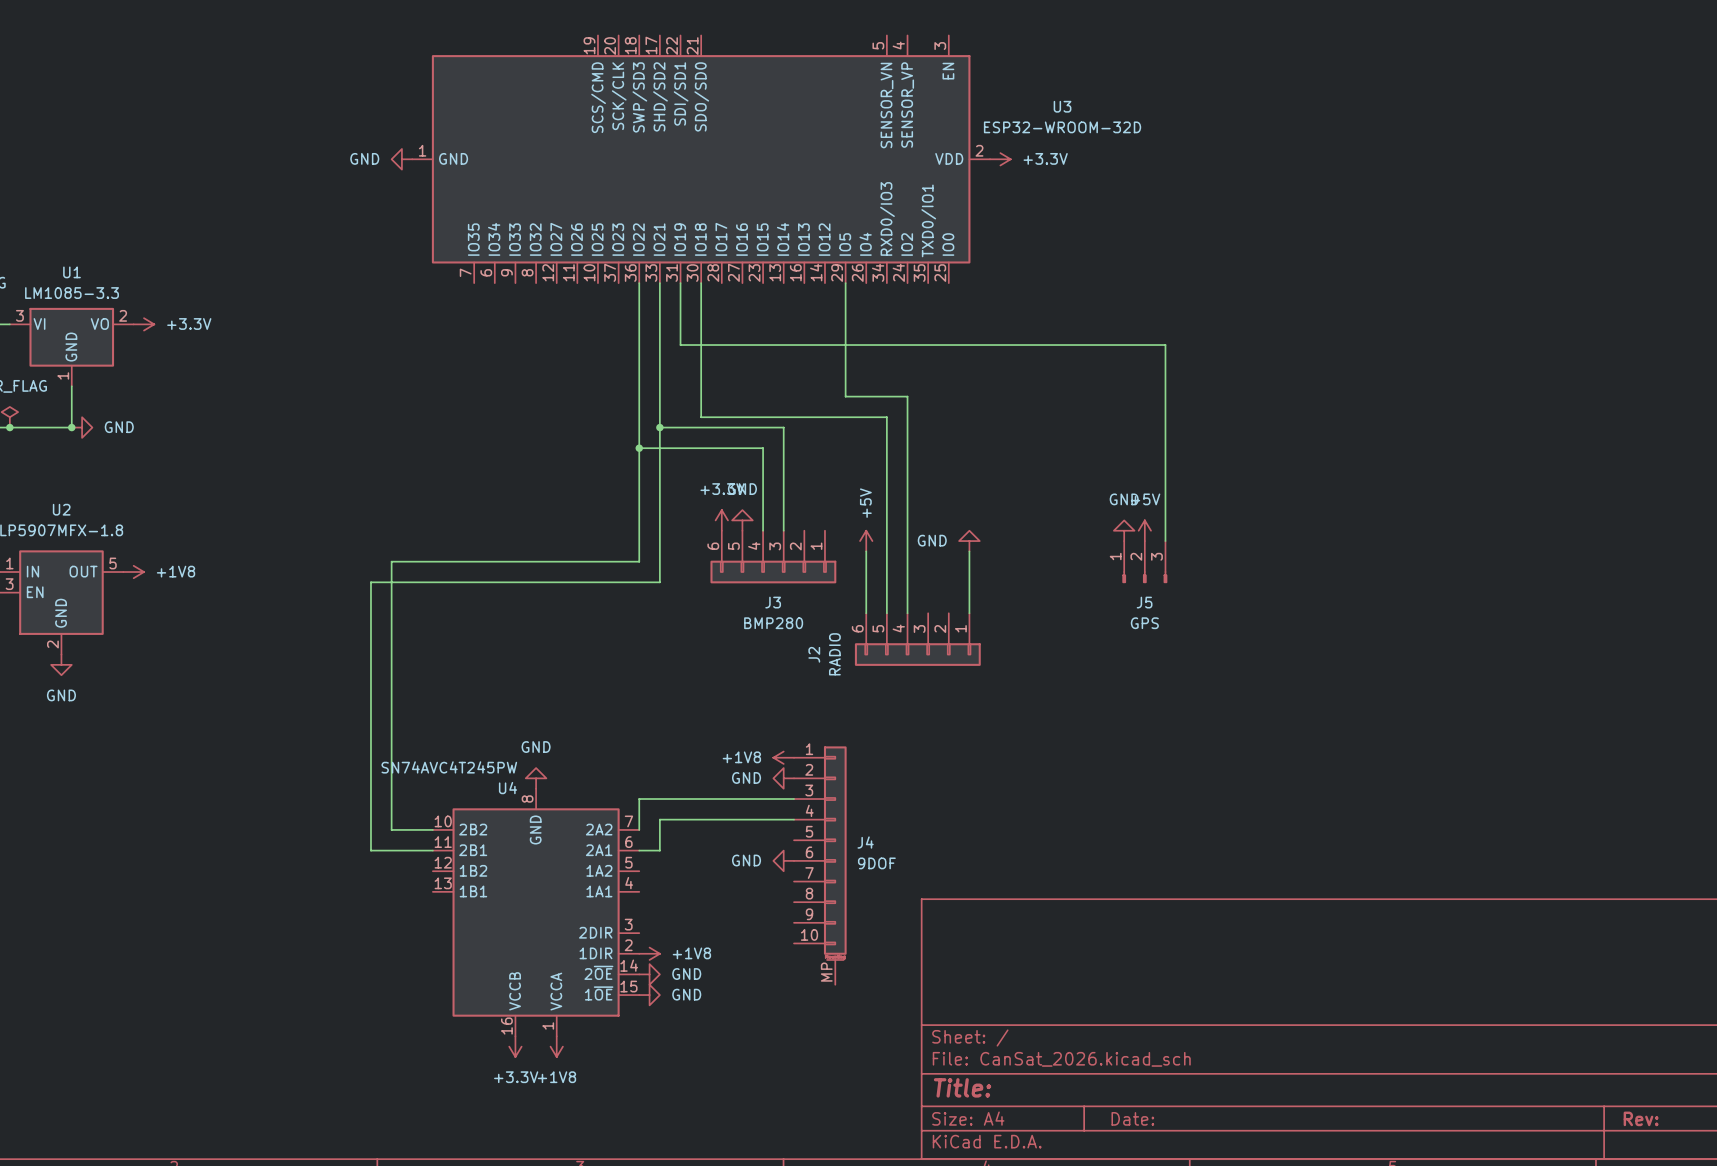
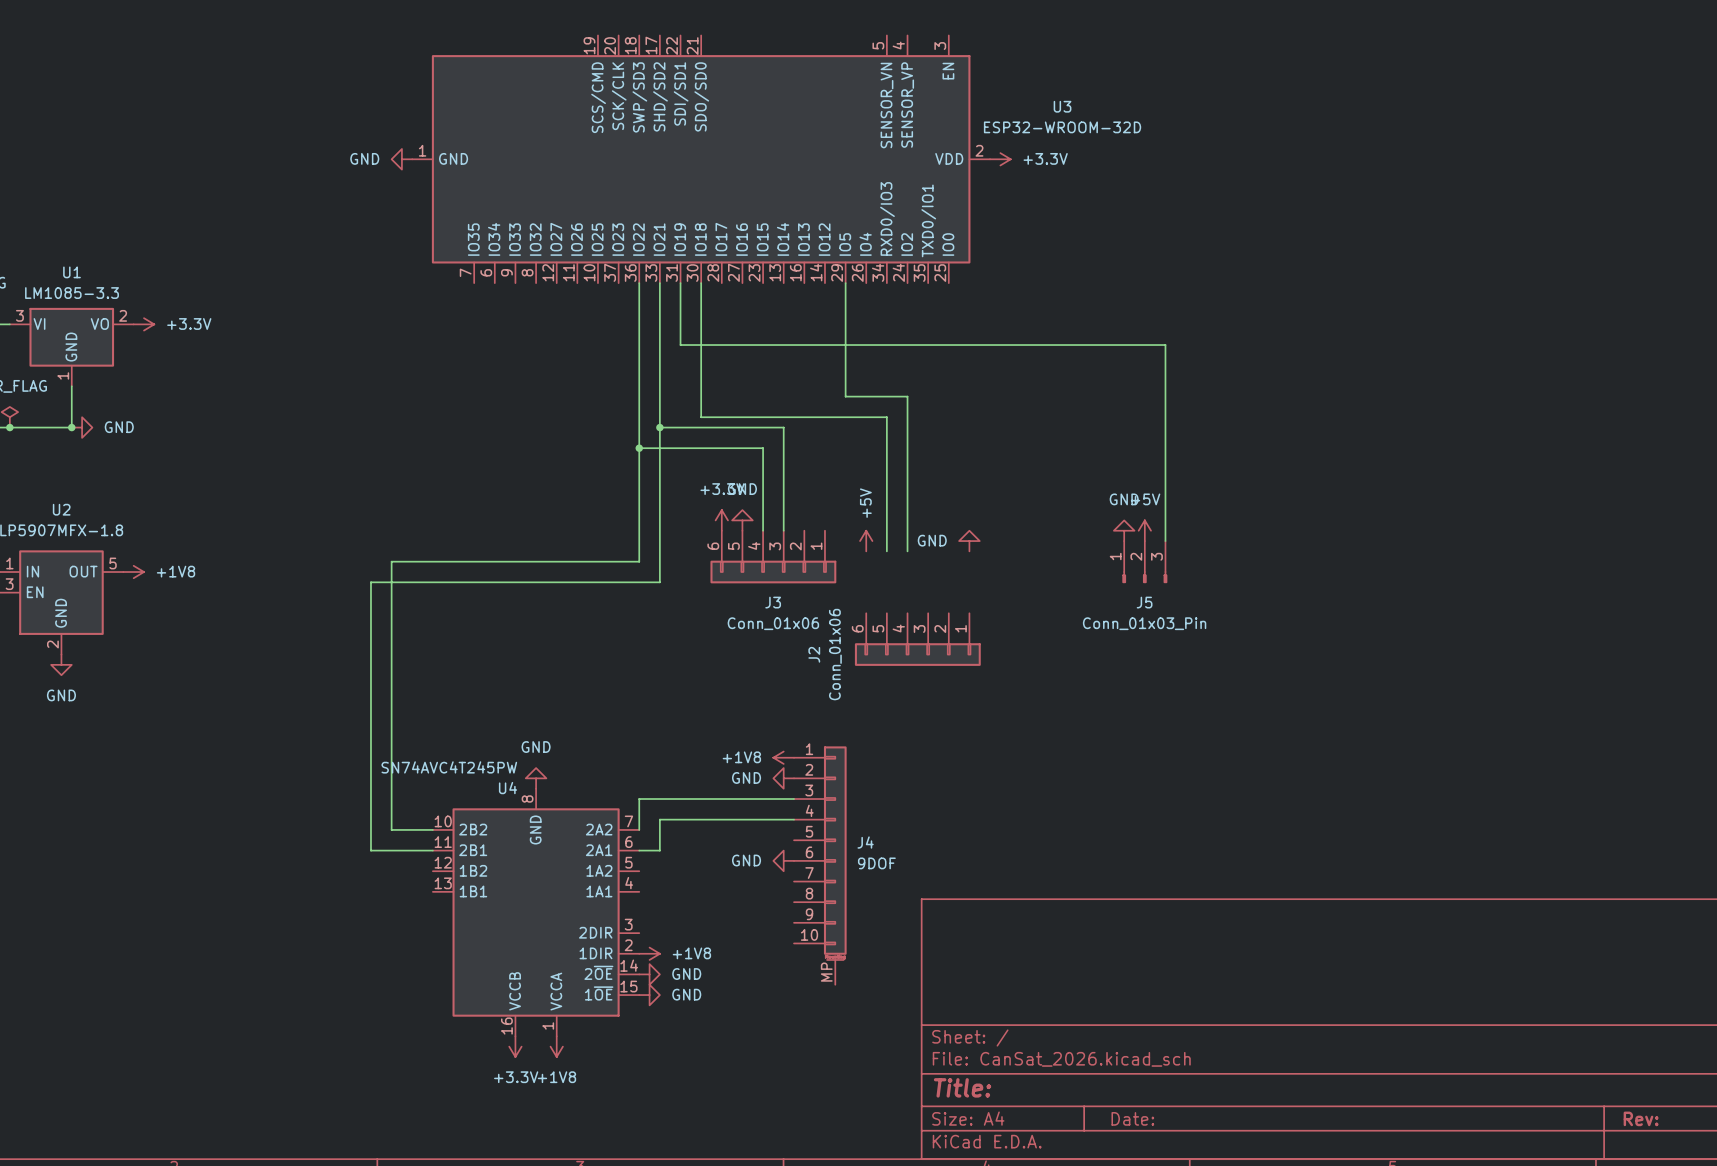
wire: (866, 551) (866, 613) -> none
wire: (886, 551) (886, 613) -> none
wire: (907, 551) (907, 613) -> none
wire: (969, 551) (969, 613) -> none
J3 value: BMP280 (773, 623) -> Conn_01x06 (773, 623)
J5 value: GPS (1144, 623) -> Conn_01x03_Pin (1144, 623)
J2 value: RADIO (834, 654) -> Conn_01x06 (835, 654)

